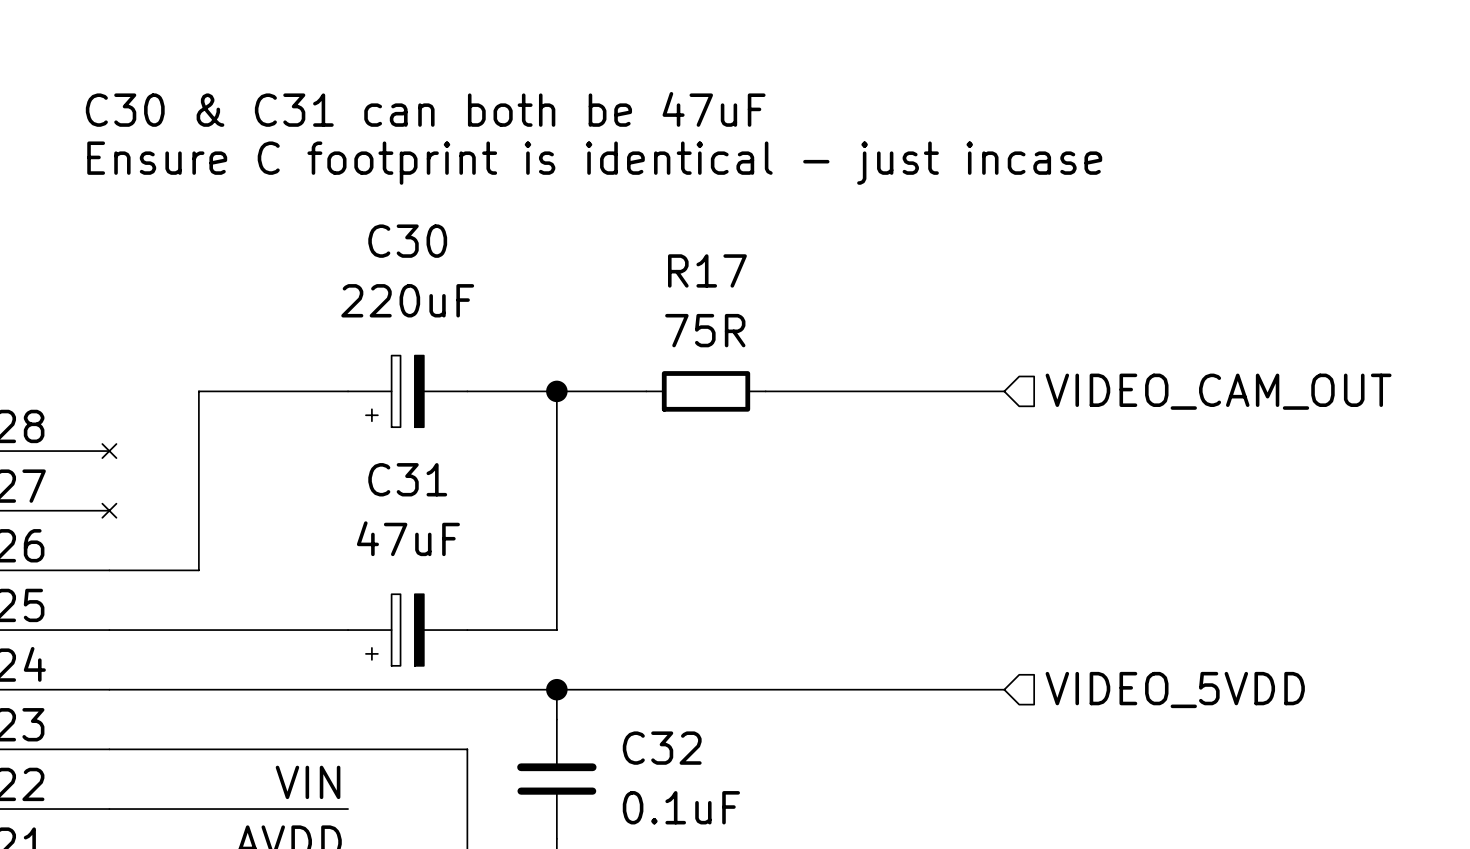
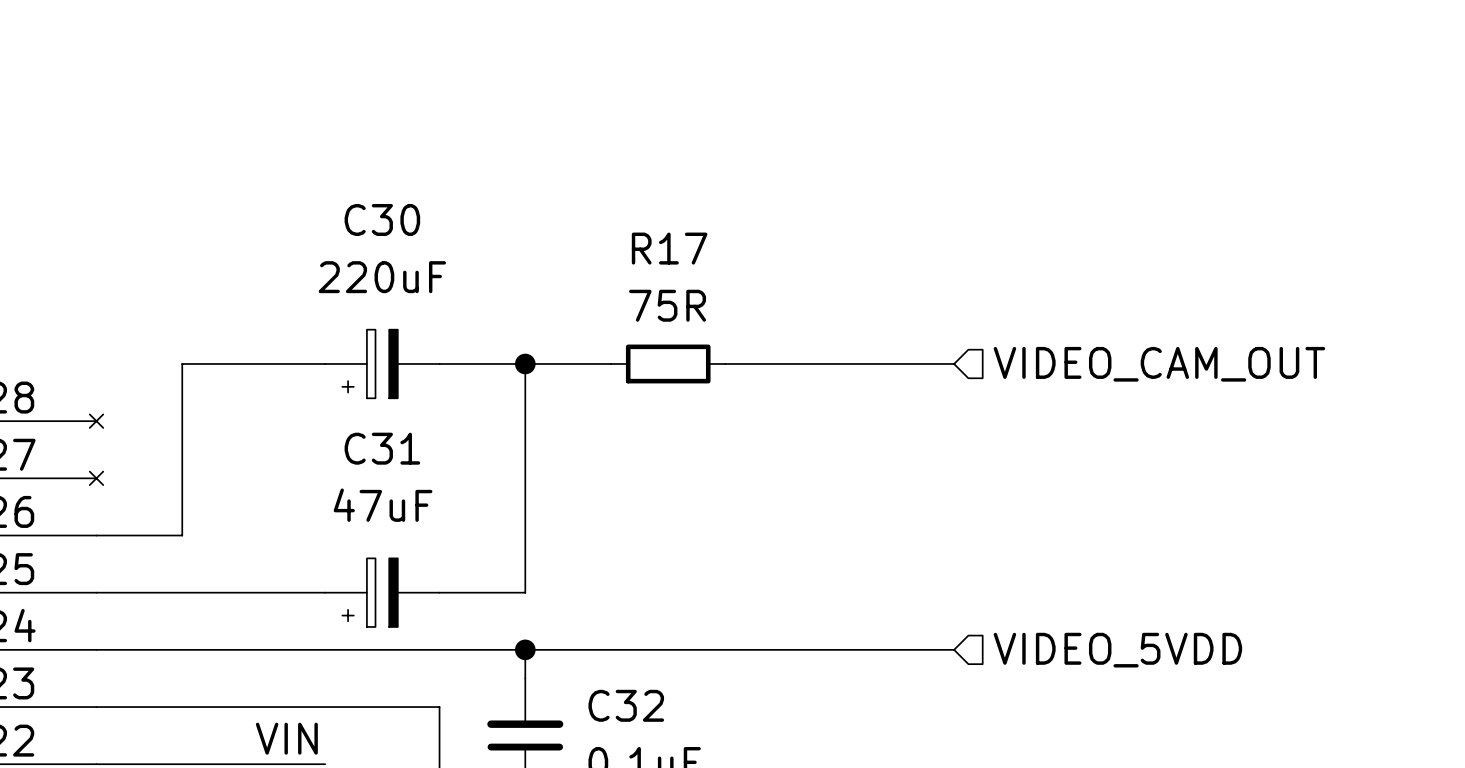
text: C30 & C31 can both be 47uF (425, 109) -> none
text: Ensure C footprint is identical - just incase (594, 163) -> none

